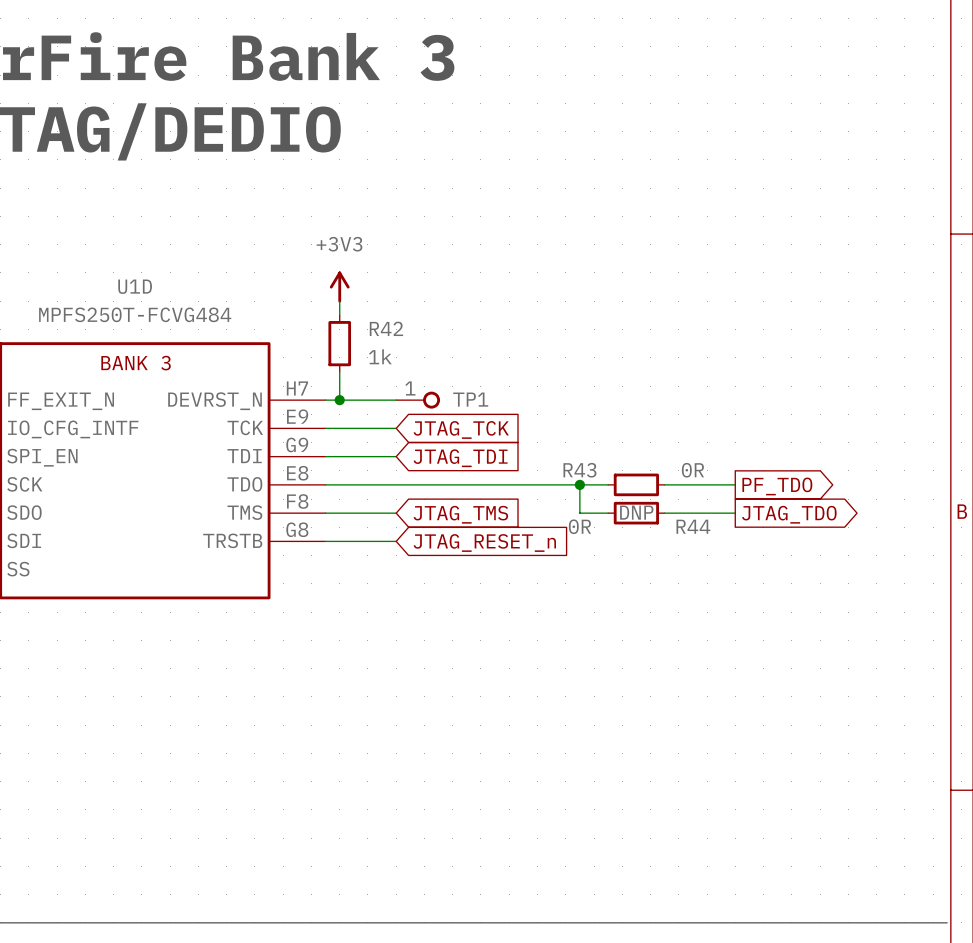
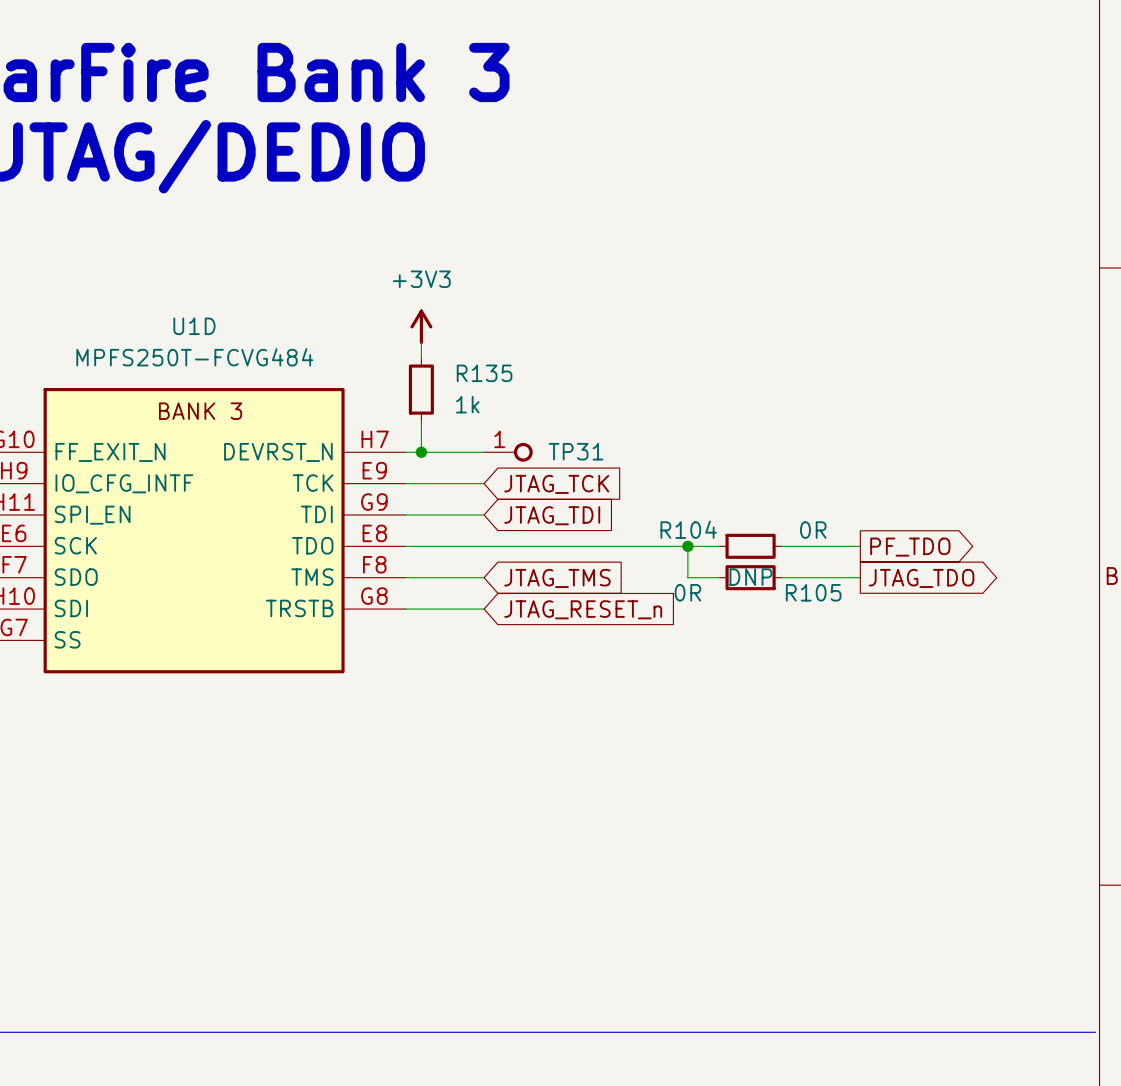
R42 name: R42 (386, 328) -> R135 (484, 373)
TP1 name: TP1 (470, 399) -> TP31 (576, 451)
R43 name: R43 (579, 470) -> R104 (688, 529)
R44 name: R44 (693, 526) -> R105 (813, 592)

